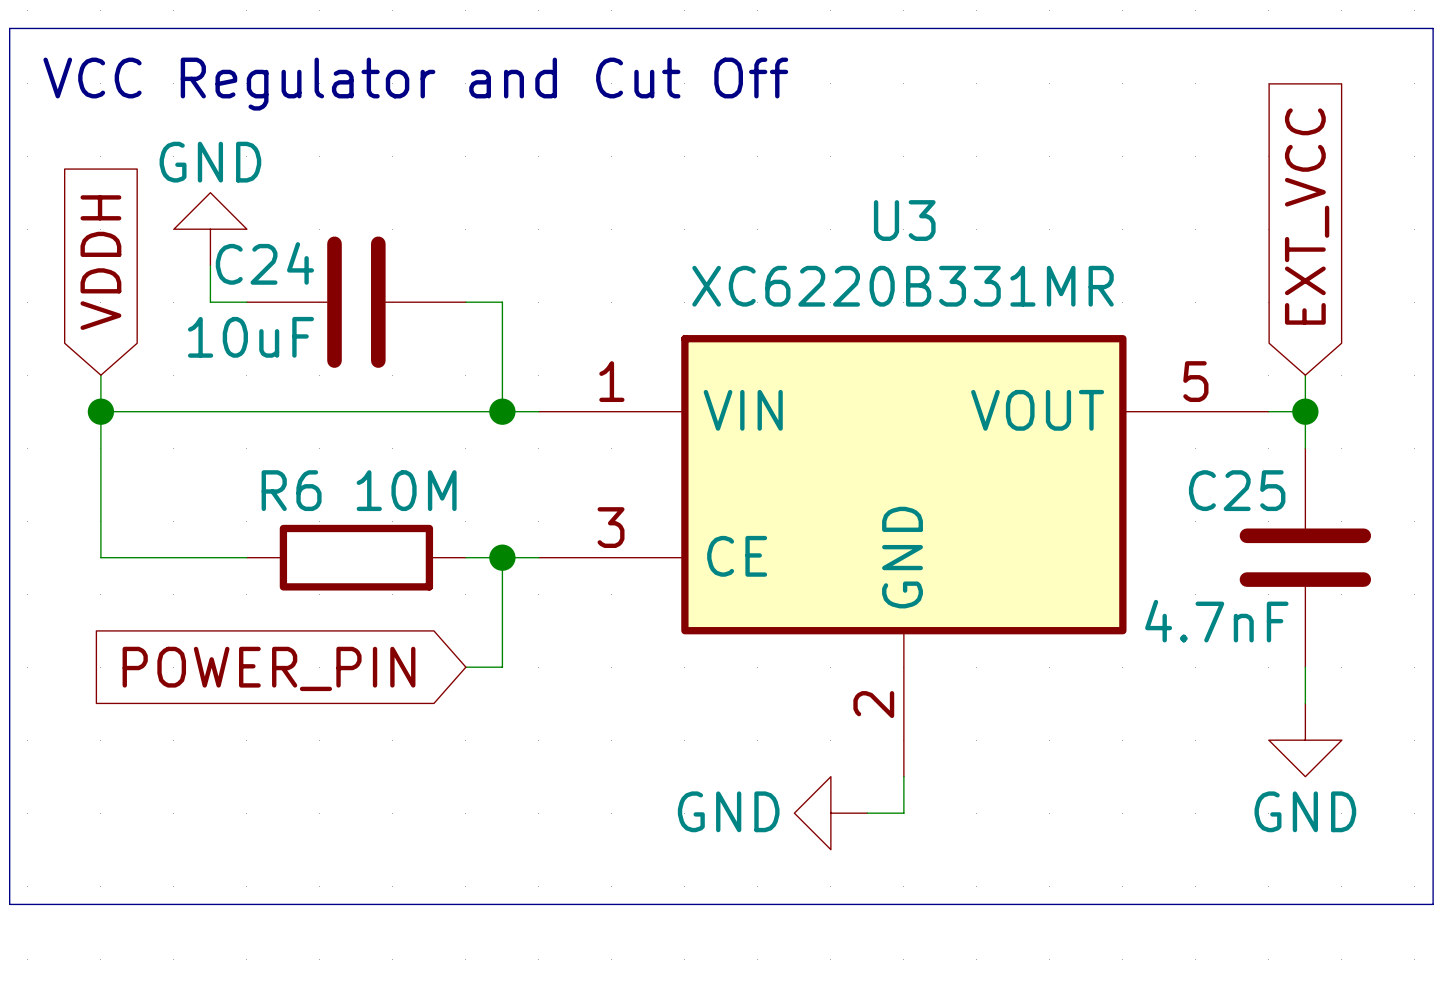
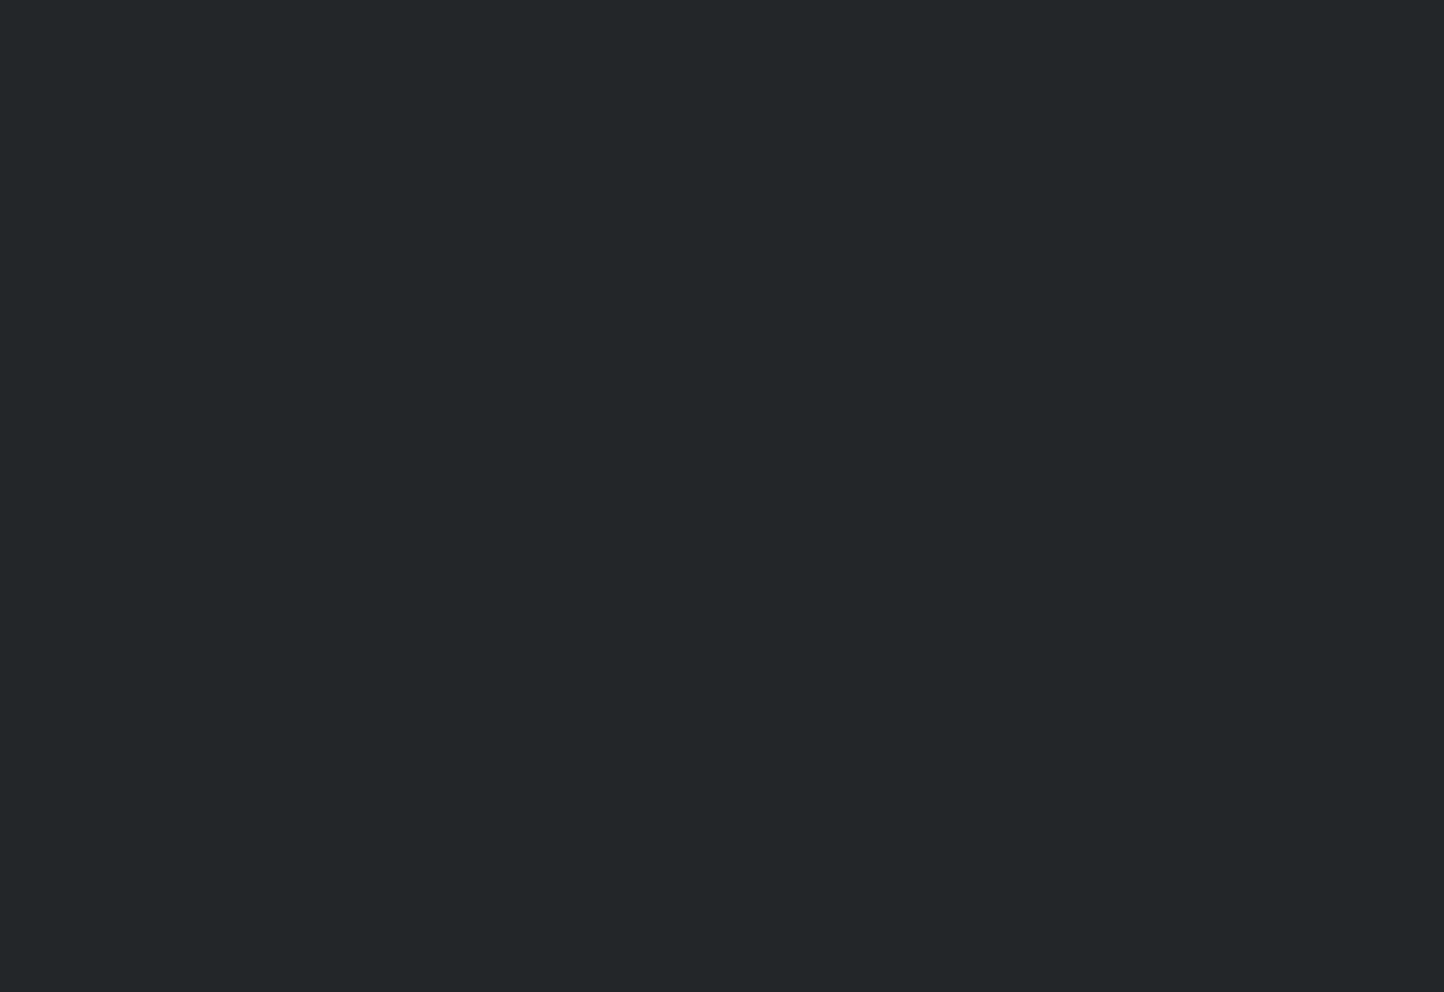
line: (9, 28) (1433, 28) (1433, 904) (9, 904) (9, 28) -> none
text: VCC Regulator and Cut Off (415, 84) -> none
global label: EXT_VCC (1307, 216) -> none
power symbol: GND (210, 229) -> none
global label: VDDH (100, 262) -> none
wire: (210, 265) (210, 302) (246, 302) -> none
C24: 10uF (356, 302) -> none
wire: (465, 302) (502, 302) (502, 411) -> none
wire: (100, 375) (100, 557) (246, 557) -> none
wire: (1305, 375) (1305, 448) -> none
wire: (100, 411) (538, 411) -> none
junction: (100, 411) -> none
junction: (502, 411) -> none
wire: (1268, 411) (1305, 411) -> none
junction: (1305, 411) -> none
U3: XC6220B331MR (903, 555) -> none
R6: 10M (356, 557) -> none
wire: (465, 557) (538, 557) -> none
wire: (502, 557) (502, 667) (465, 667) -> none
junction: (502, 557) -> none
C25: 4.7nF (1305, 557) -> none
wire: (1305, 667) (1305, 703) -> none
global label: POWER_PIN (269, 668) -> none
power symbol: GND (1305, 740) -> none
wire: (903, 776) (903, 813) (867, 813) -> none
power symbol: GND (830, 813) -> none

